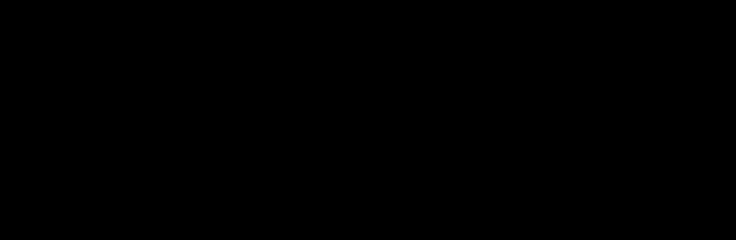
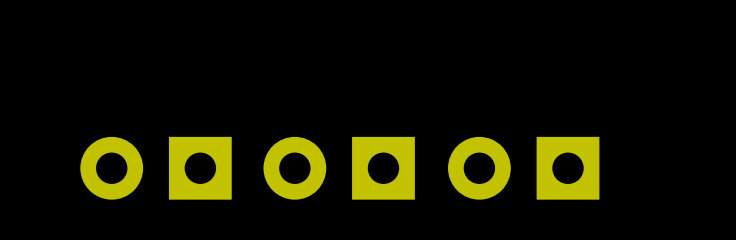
part: none -> (156, 168)
part: none -> (339, 168)
part: none -> (523, 168)

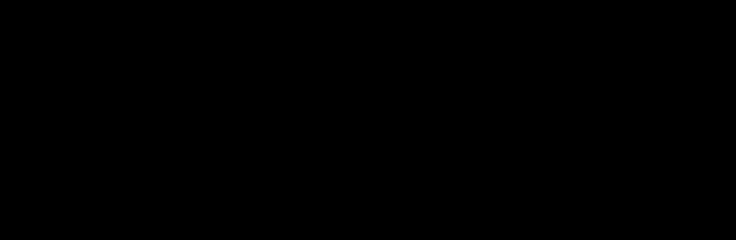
part: (156, 168) -> none
part: (339, 168) -> none
part: (523, 168) -> none

